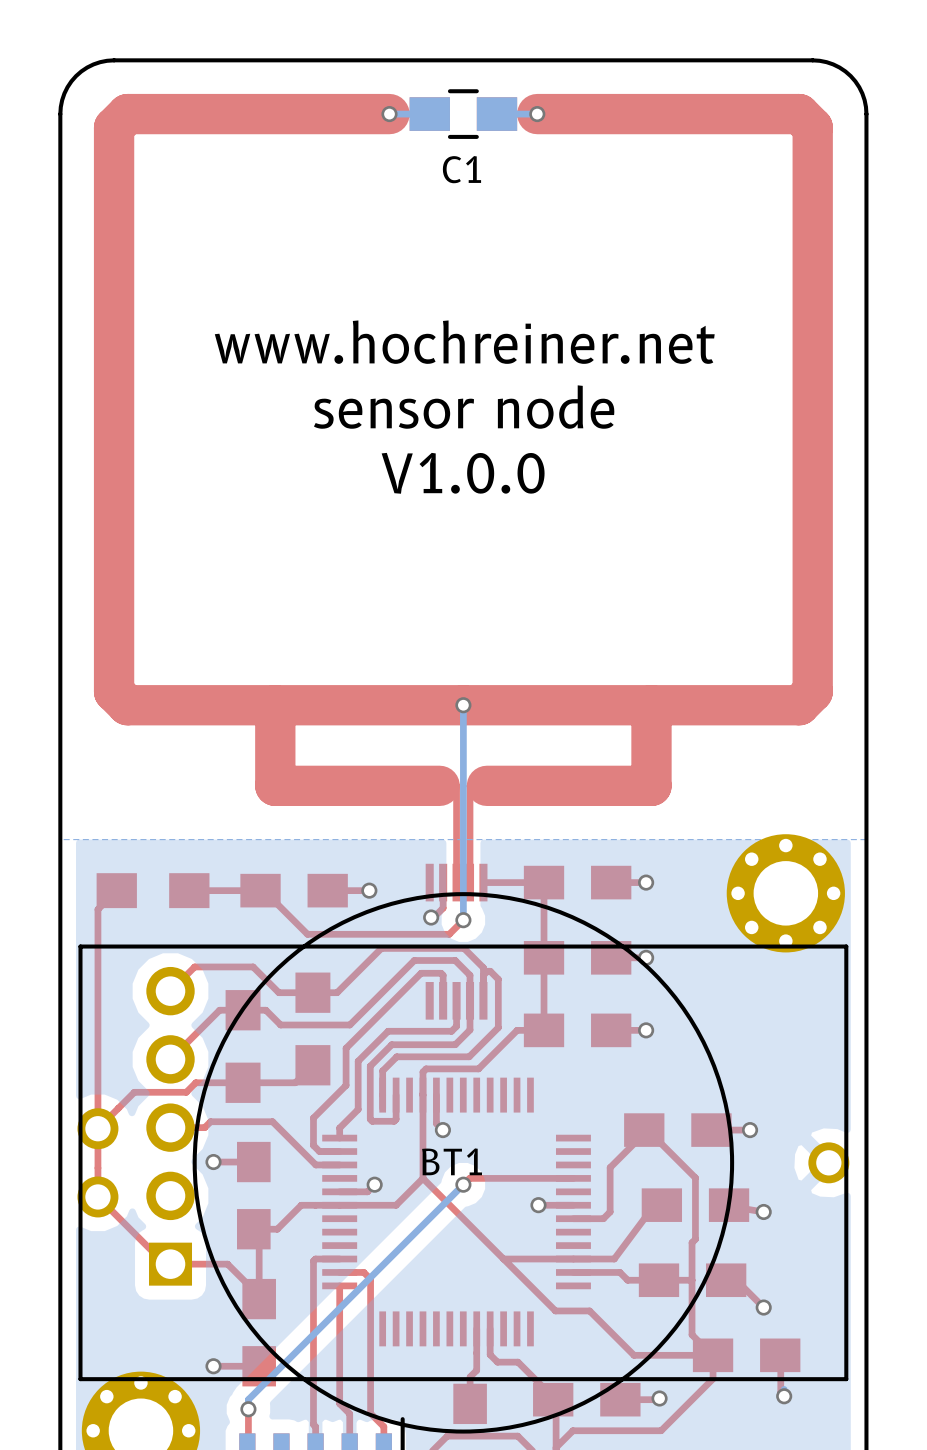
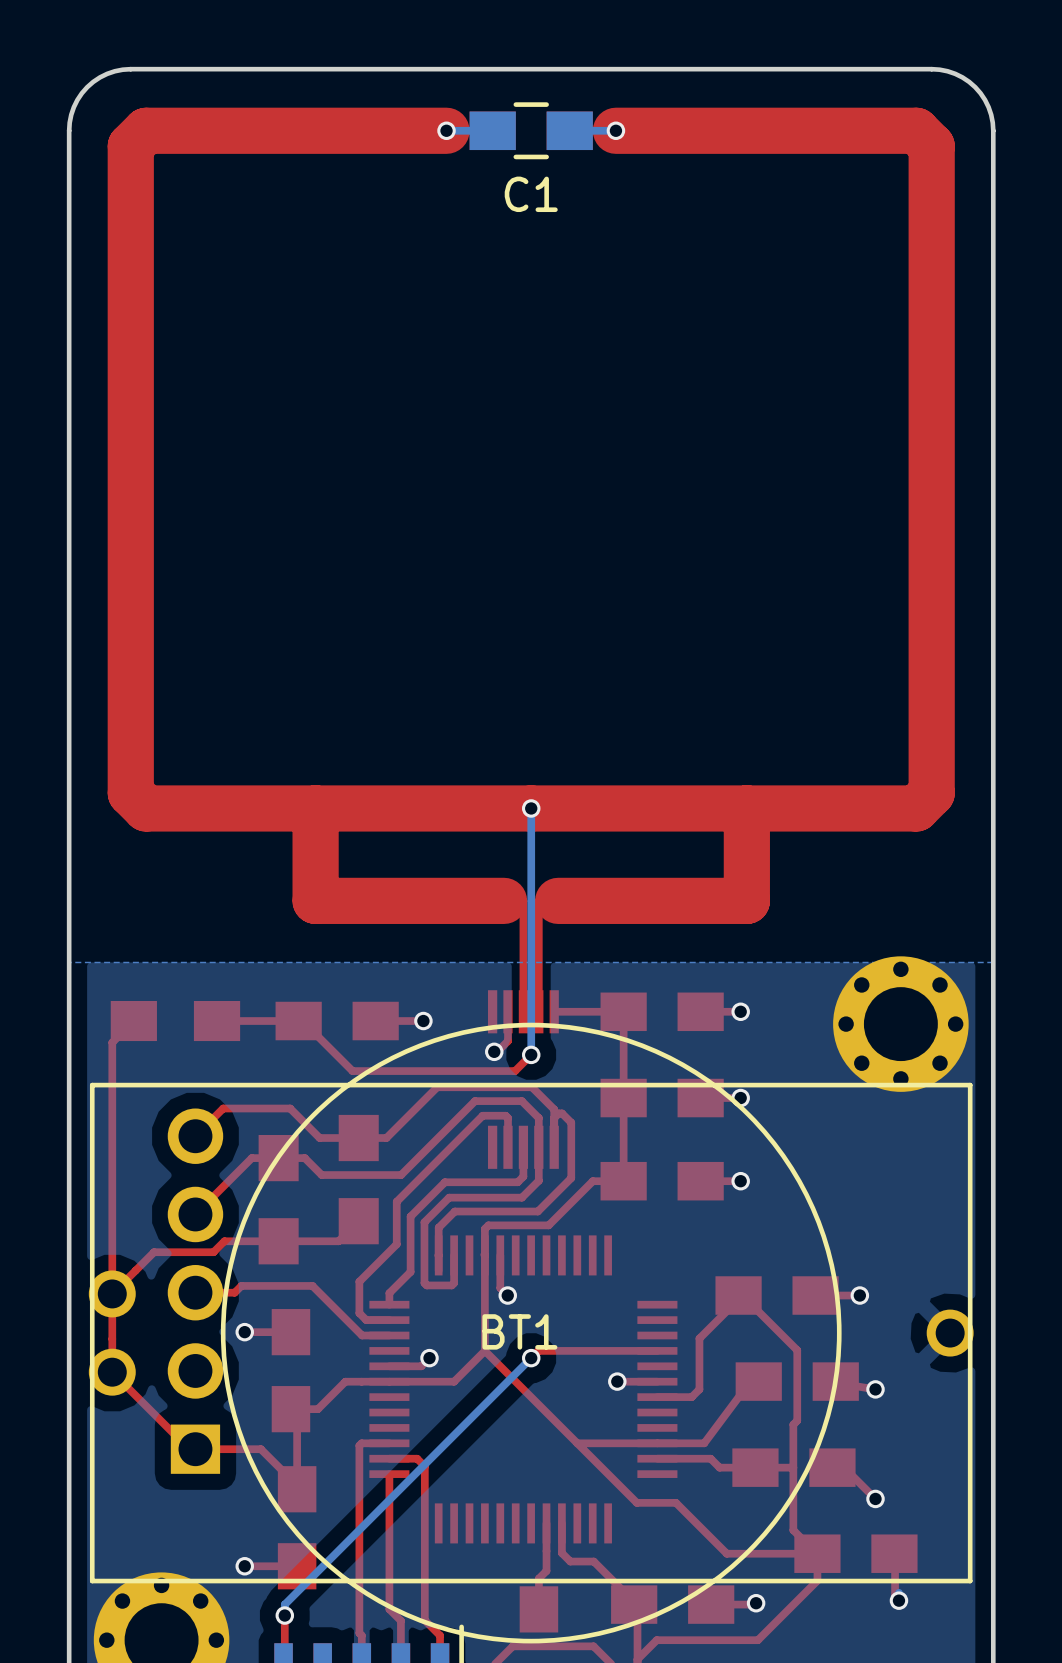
text: www.hochreiner.net (464, 342) -> none
text: sensor node (464, 407) -> none
text: V1.0.0 (463, 473) -> none

